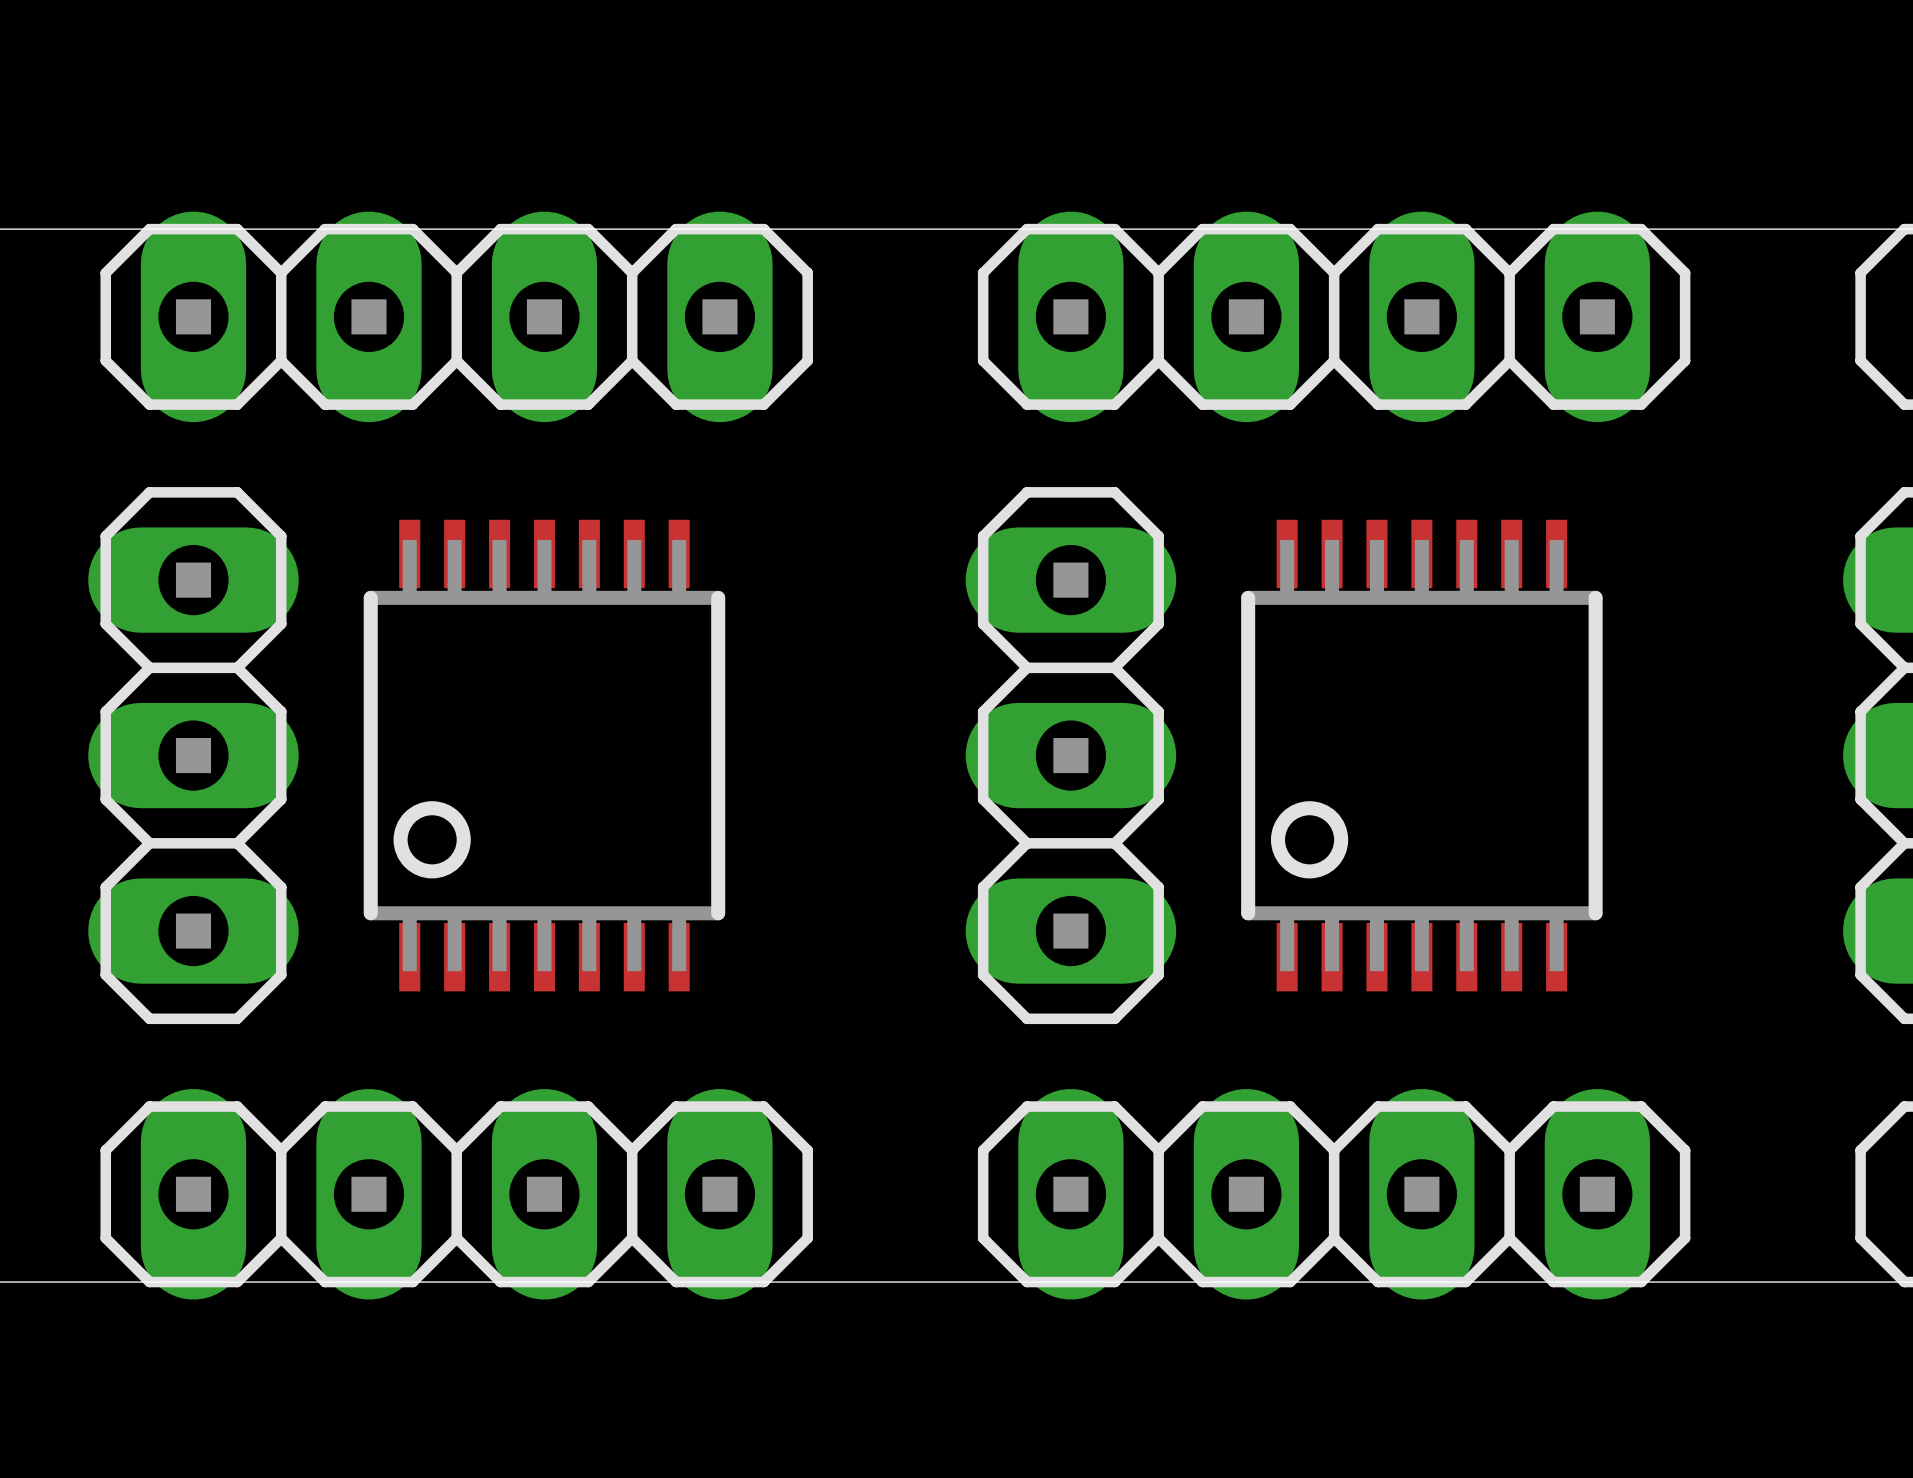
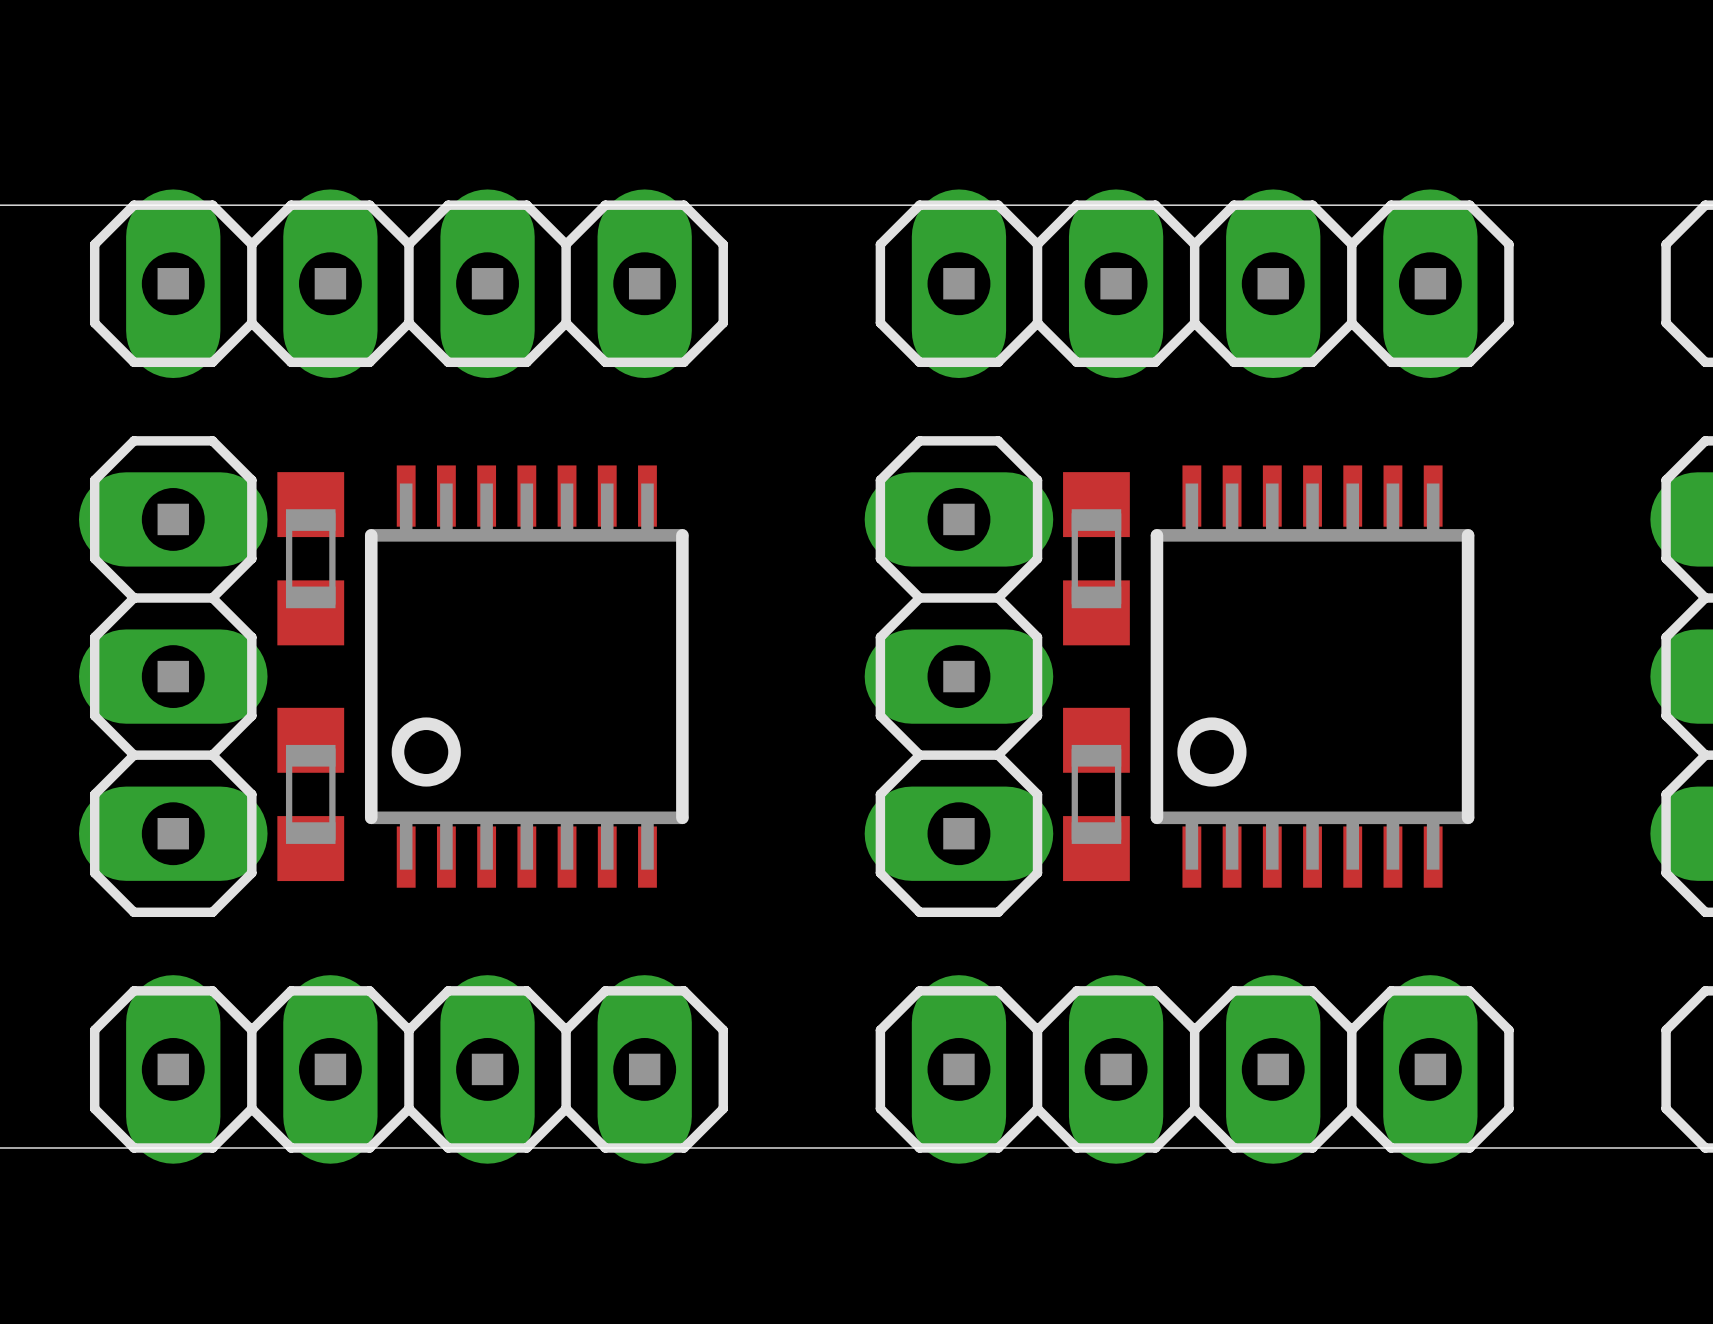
part: none -> (310, 558)
part: none -> (1096, 558)
part position: (544, 755) -> (526, 676)
part position: (1421, 755) -> (1312, 676)
part: none -> (310, 794)
part: none -> (1096, 794)

